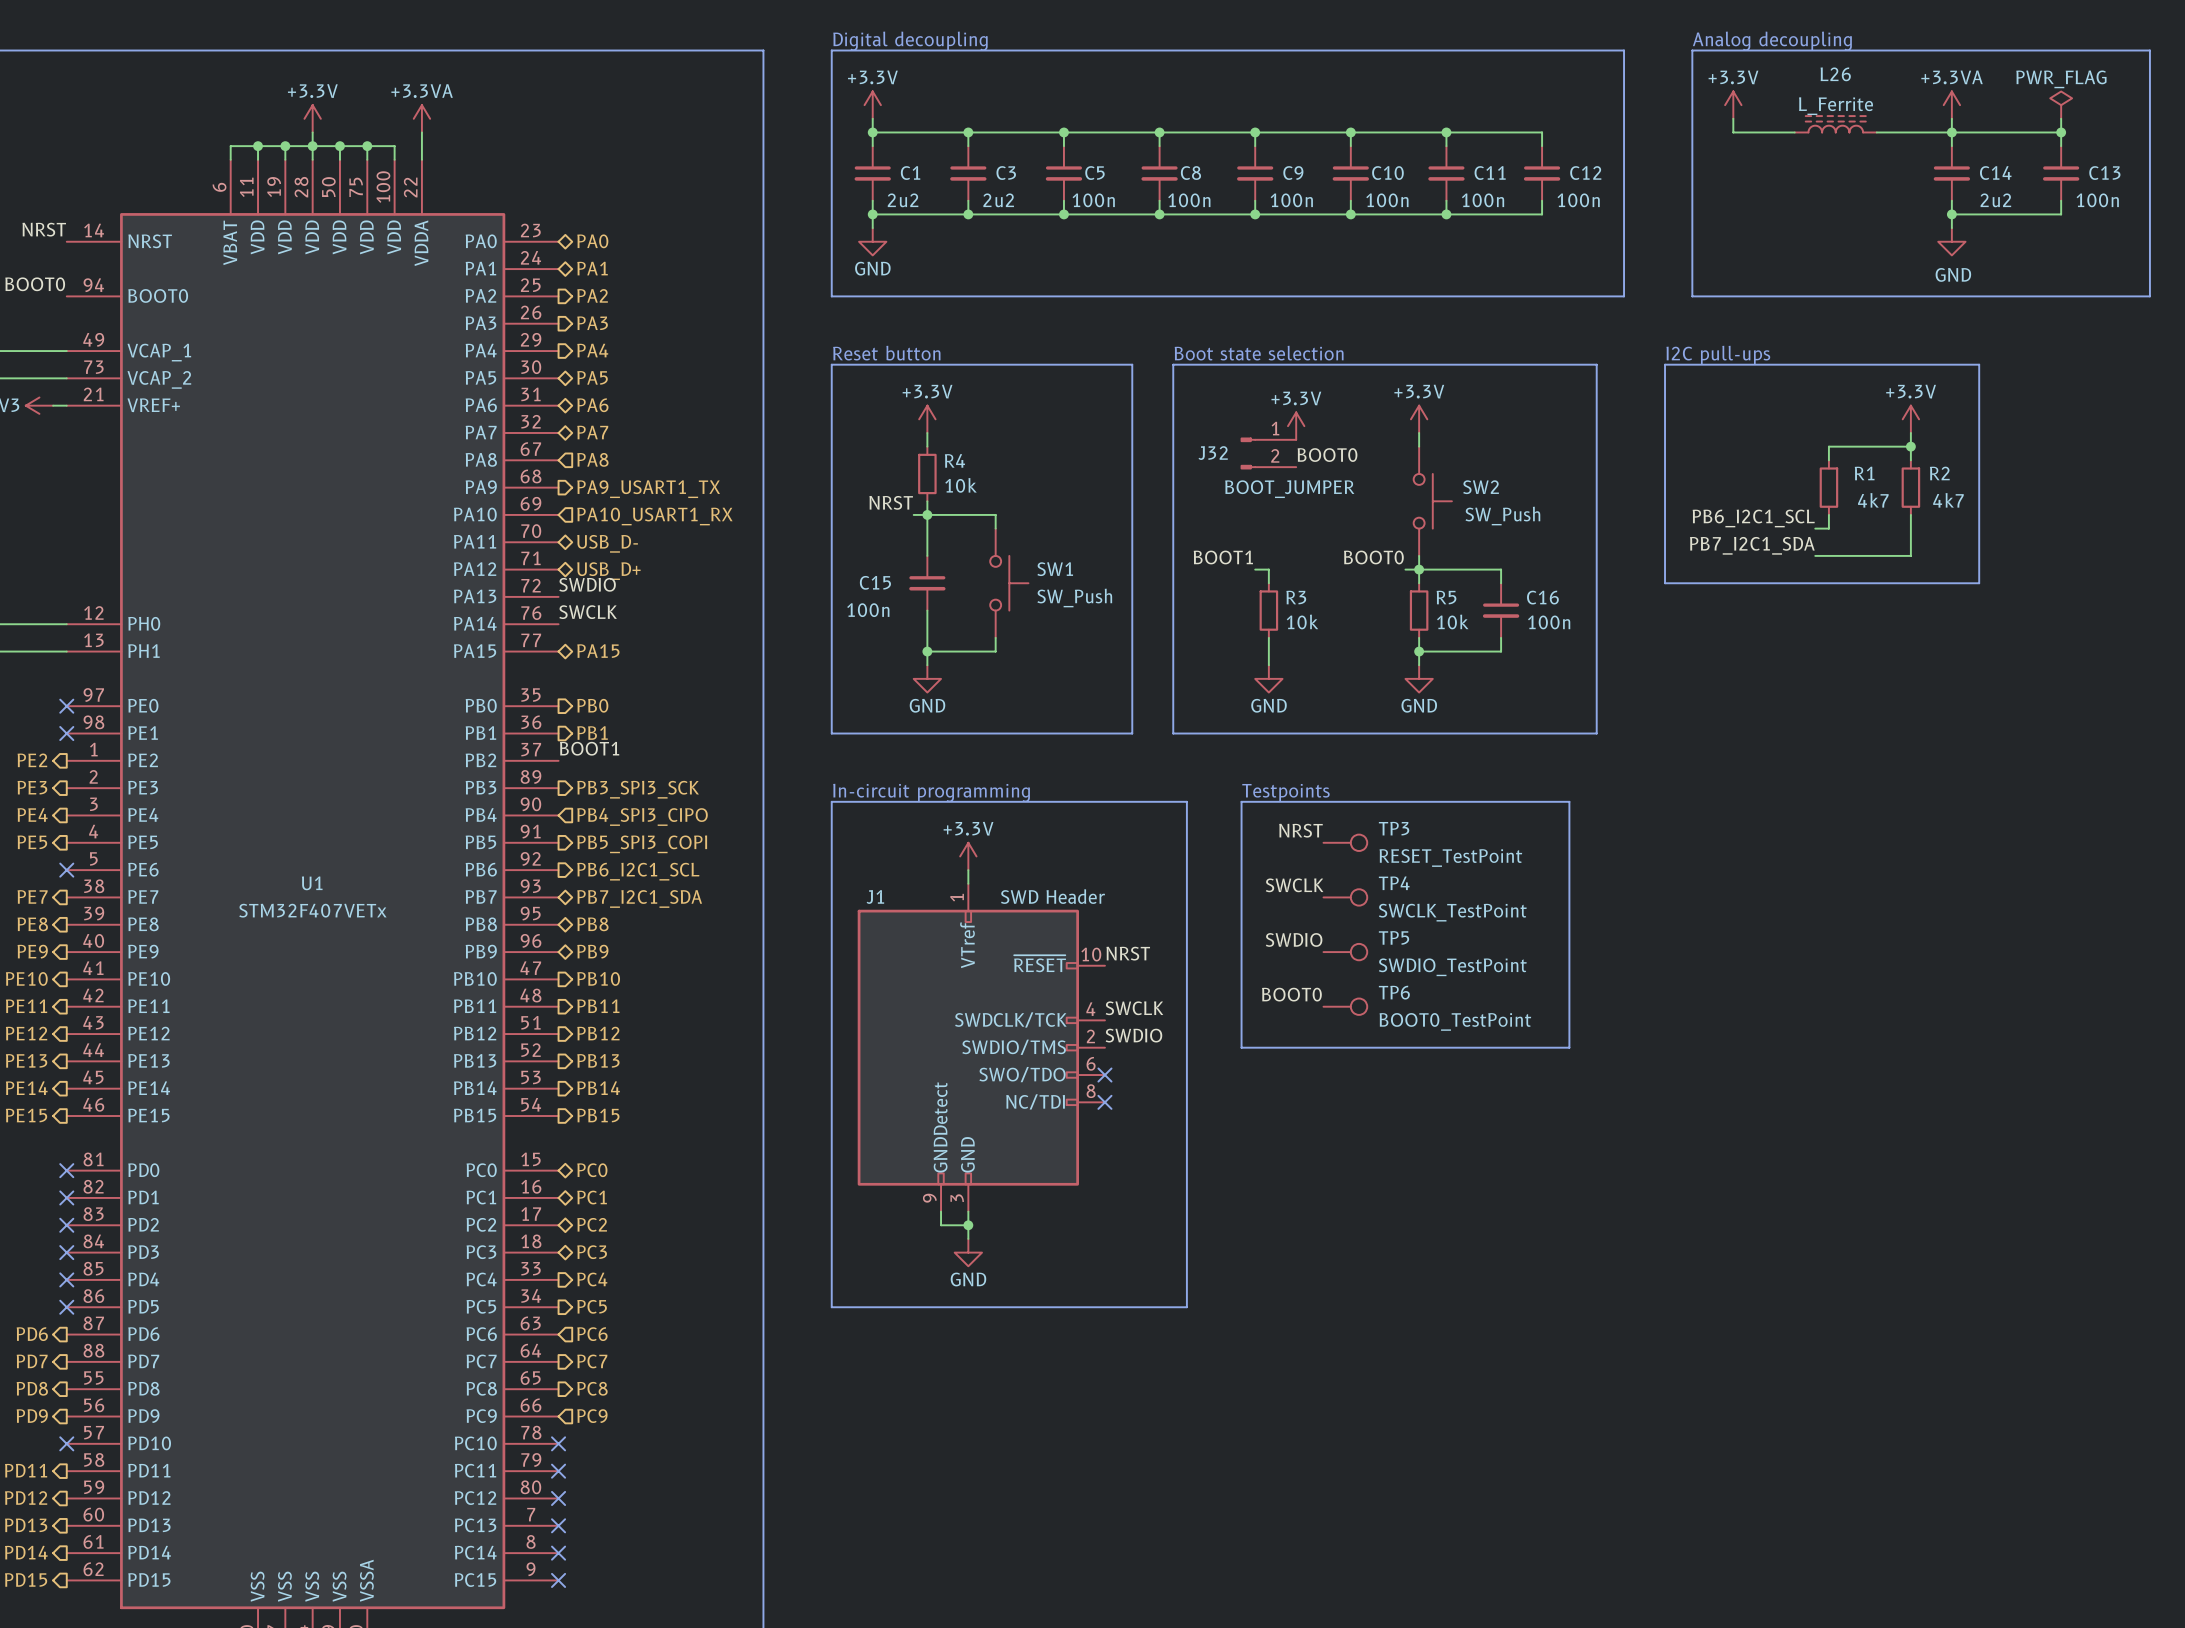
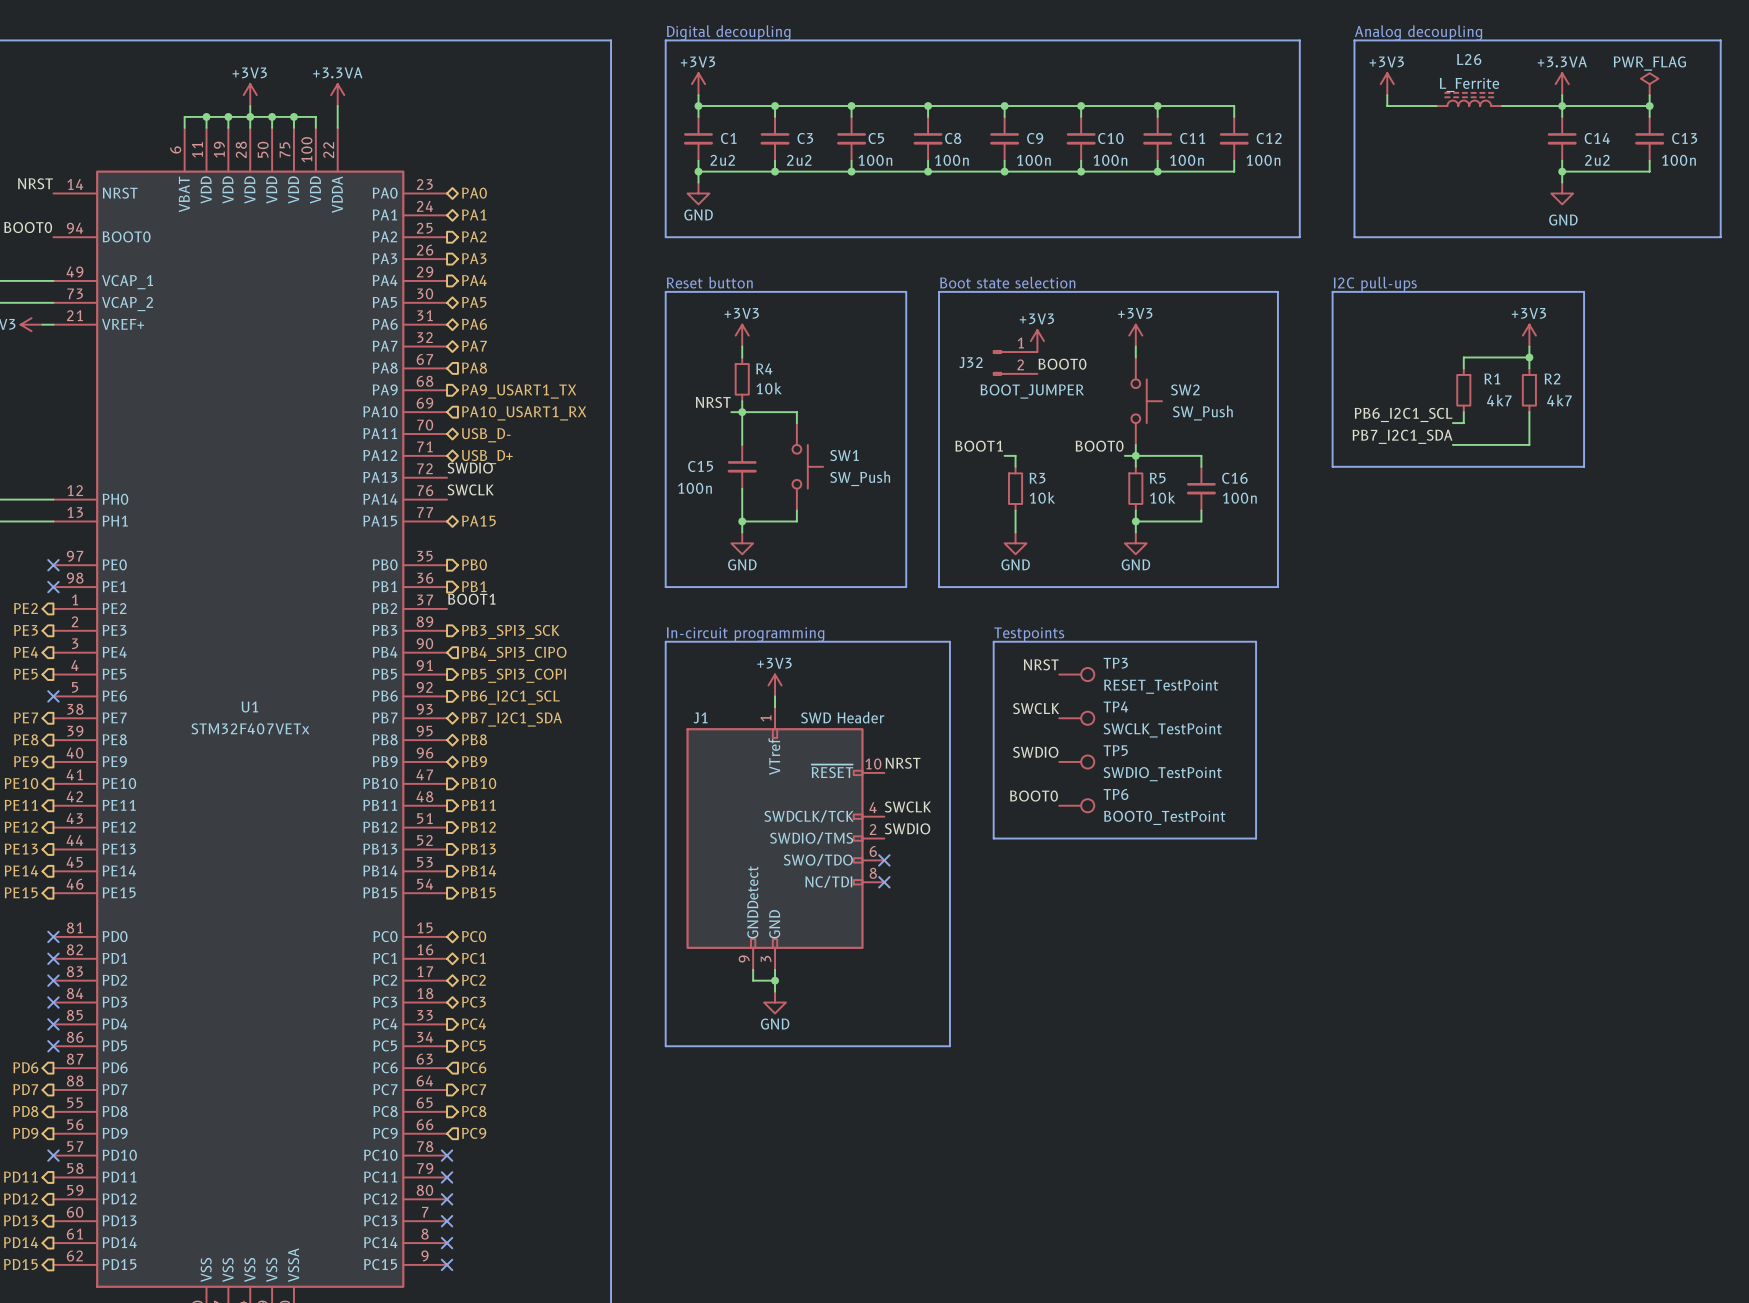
power symbol: +3.3V (872, 105) -> +3V3 (698, 84)
power symbol: +3.3V (1733, 105) -> +3V3 (1387, 84)
power symbol: +3.3V (312, 118) -> +3V3 (250, 95)
power symbol: +3.3V (927, 419) -> +3V3 (742, 335)
power symbol: +3.3V (1419, 419) -> +3V3 (1135, 335)
power symbol: +3.3V (1910, 419) -> +3V3 (1529, 335)
power symbol: +3.3V (1296, 426) -> +3V3 (1037, 341)
power symbol: +3.3V (968, 856) -> +3V3 (775, 685)

